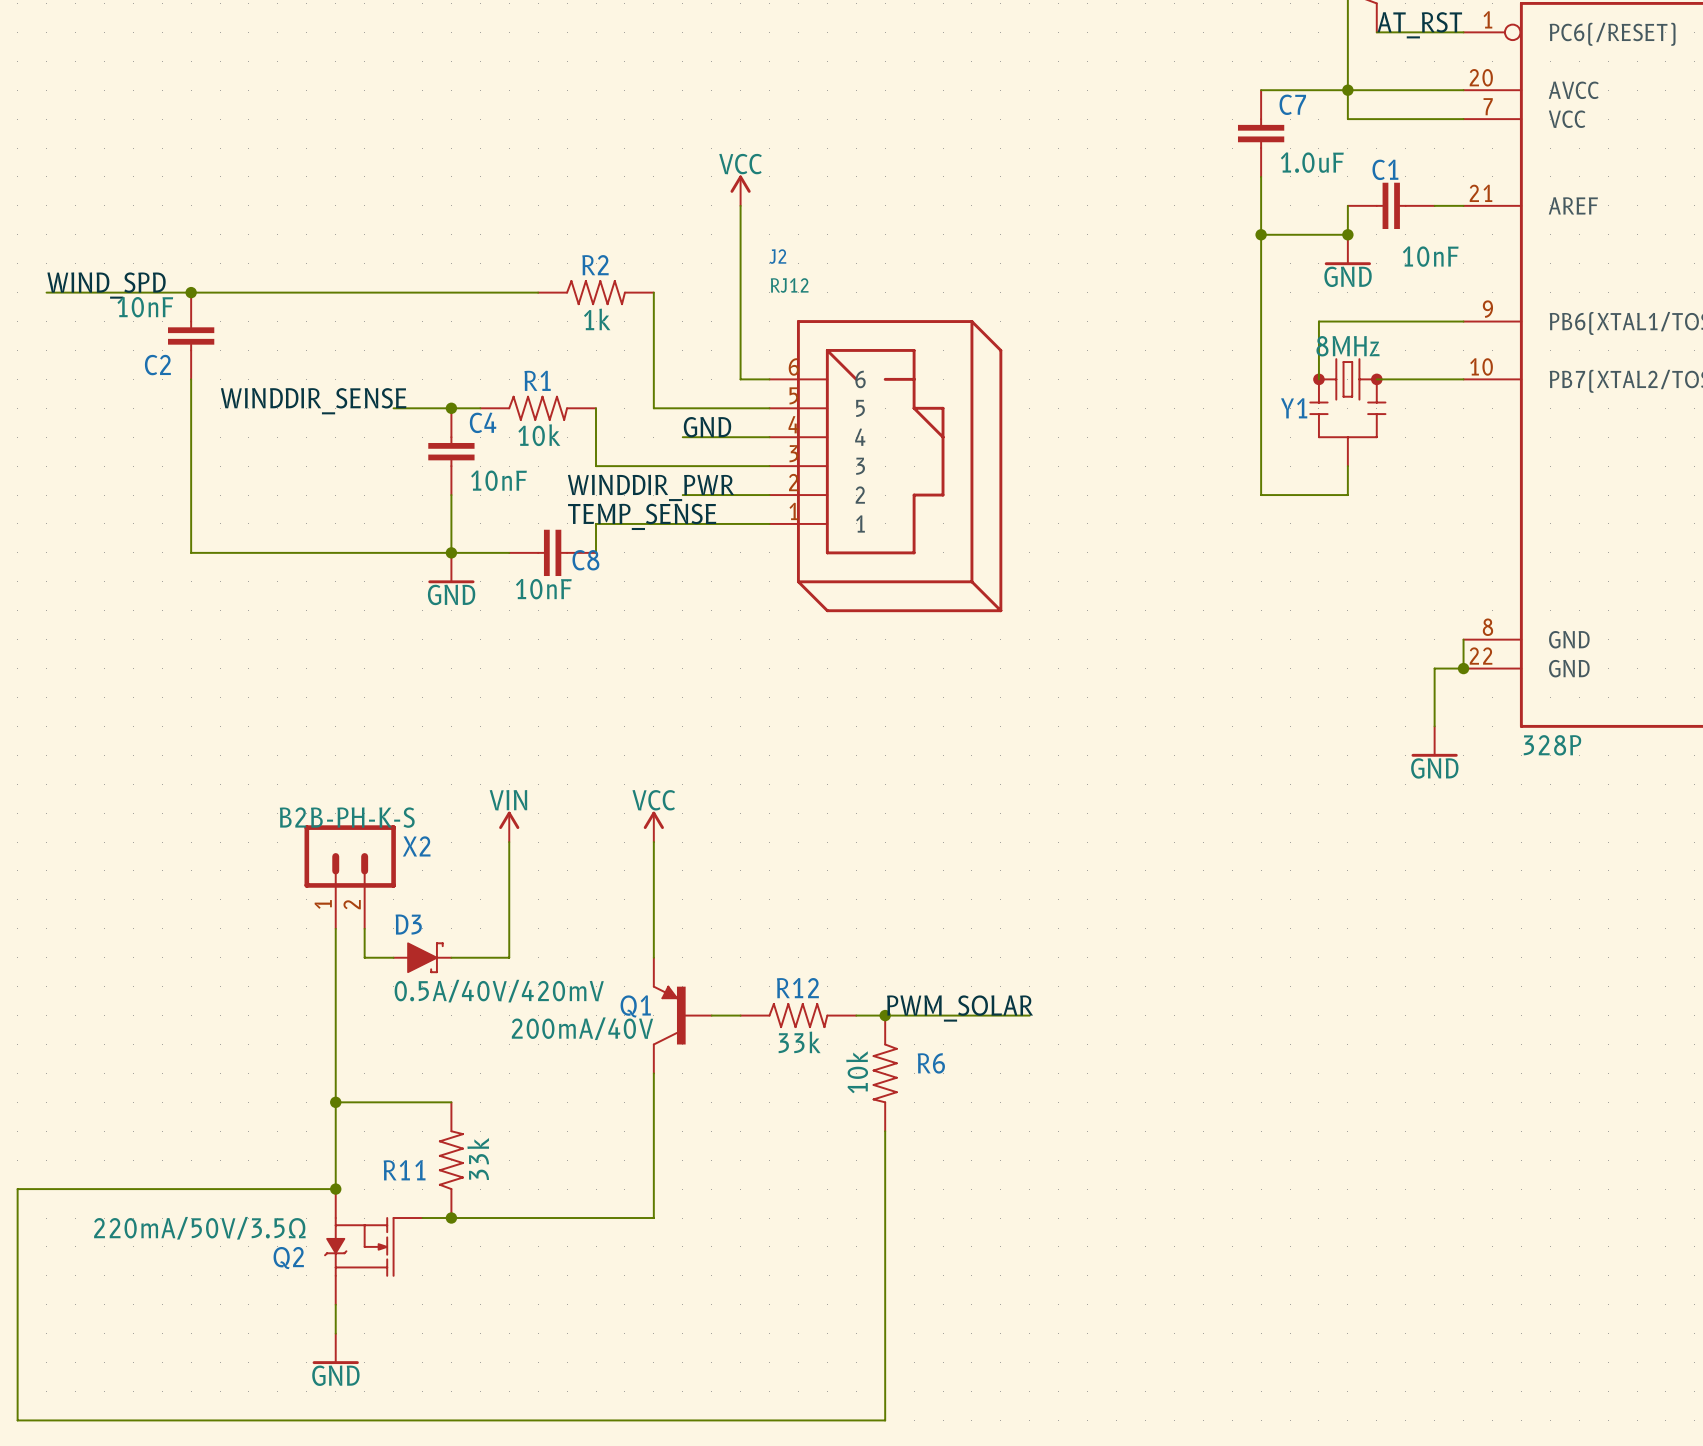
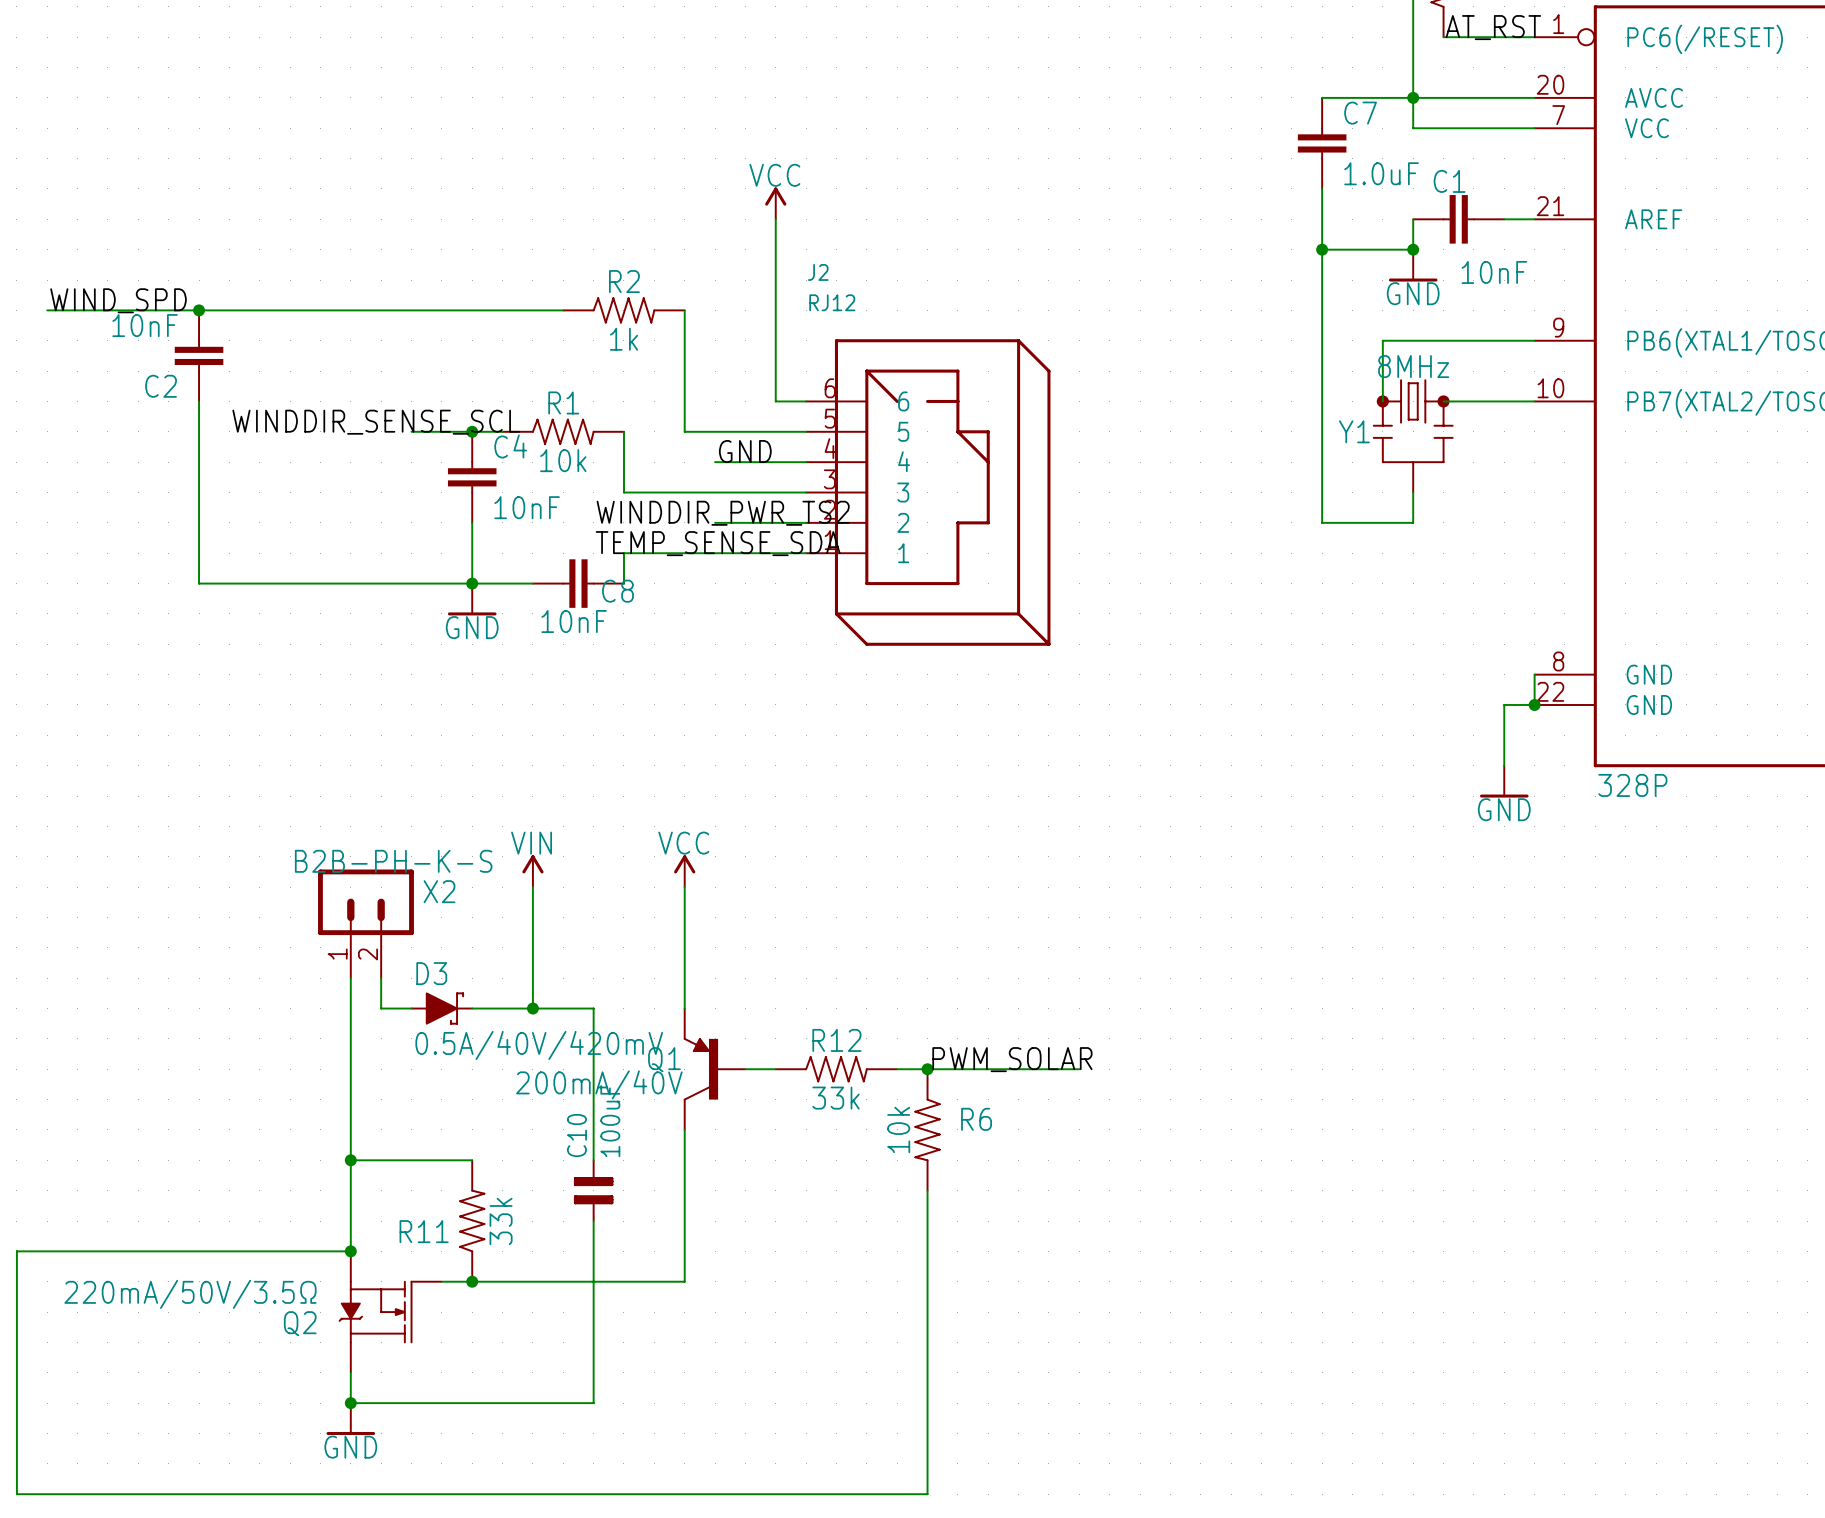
label: WINDDIR_SENSE (313, 401) -> WINDDIR_SENSE_SCL (376, 422)
label: WINDDIR_PWR (650, 487) -> WINDDIR_PWR_TS2 (723, 513)
label: TEMP_SENSE (642, 516) -> TEMP_SENSE_SDA (718, 543)
wire: none -> (532, 1008) (593, 1008) (593, 1160)
junction: none -> (532, 1008)
C10: none -> 100uF (593, 1190)
wire: none -> (593, 1221) (593, 1403) (350, 1403)
junction: none -> (350, 1403)

